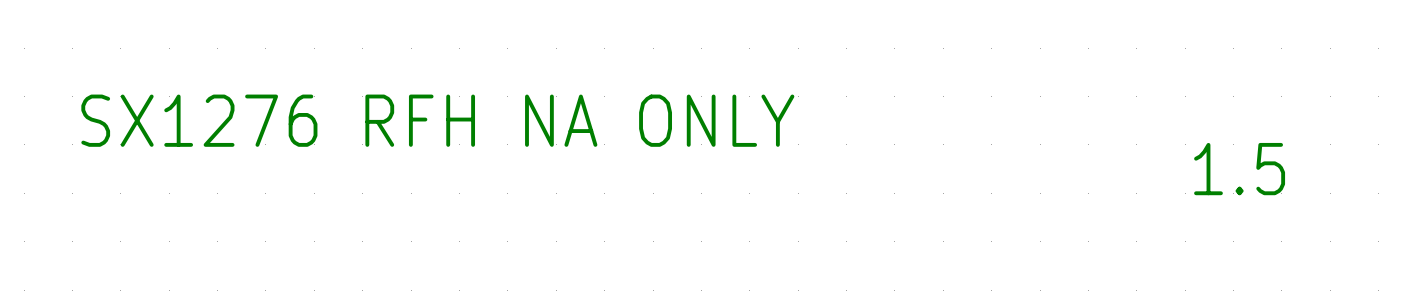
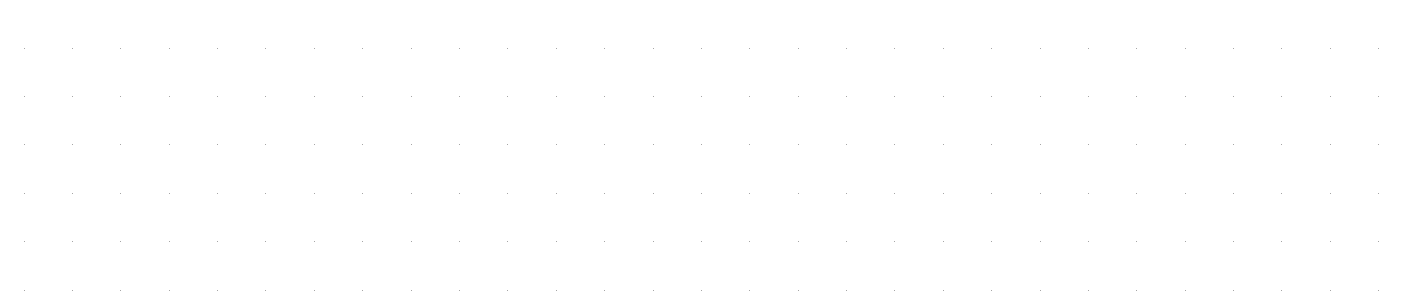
text: SX1276 RFH NA ONLY (437, 120) -> none
text: 1.5 (1239, 169) -> none

